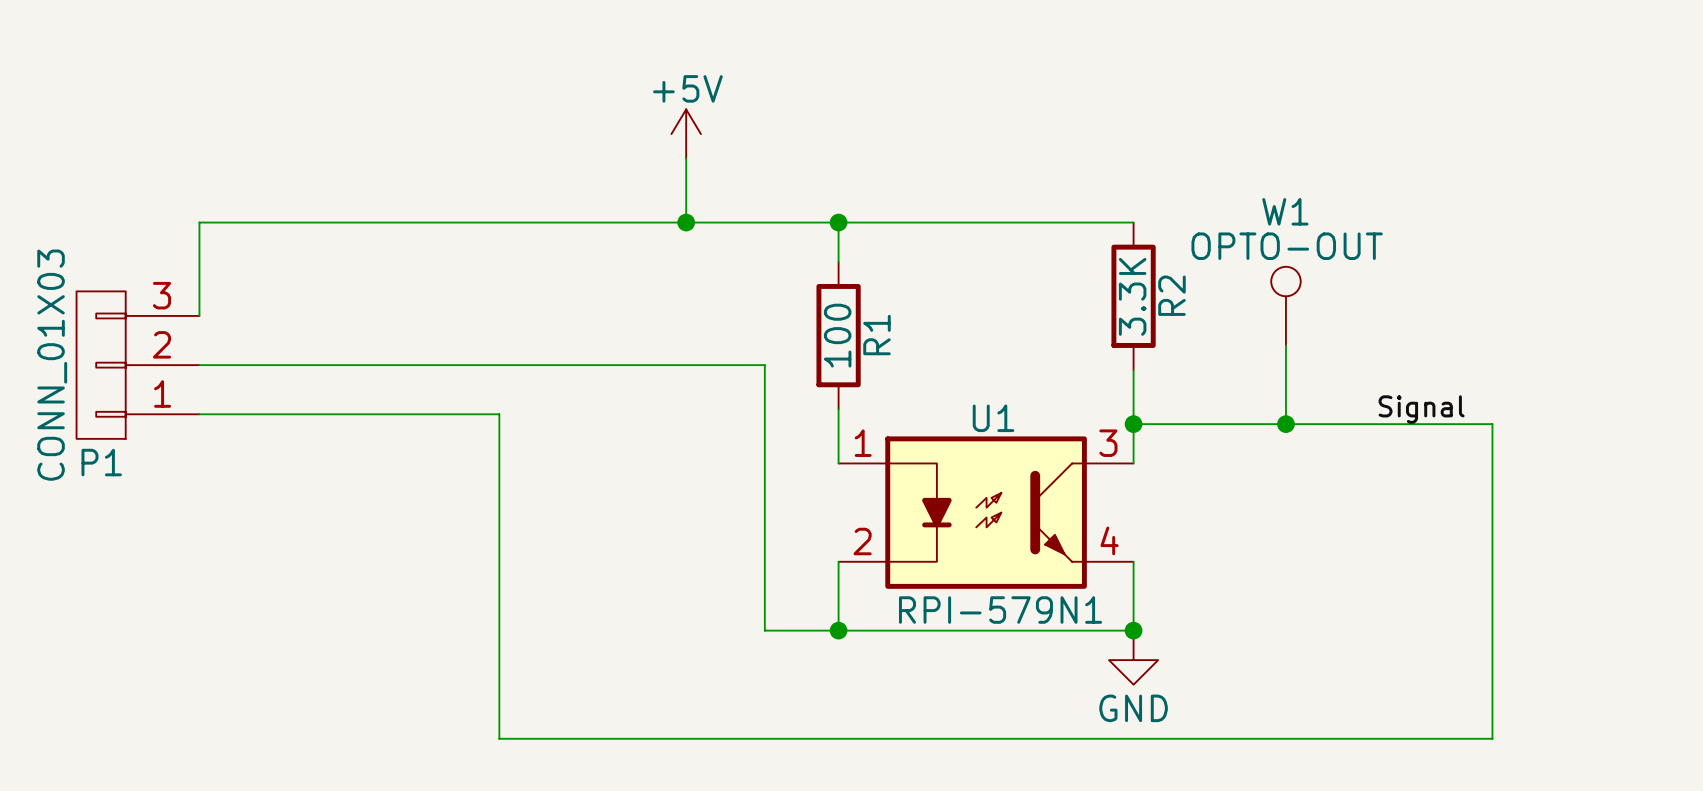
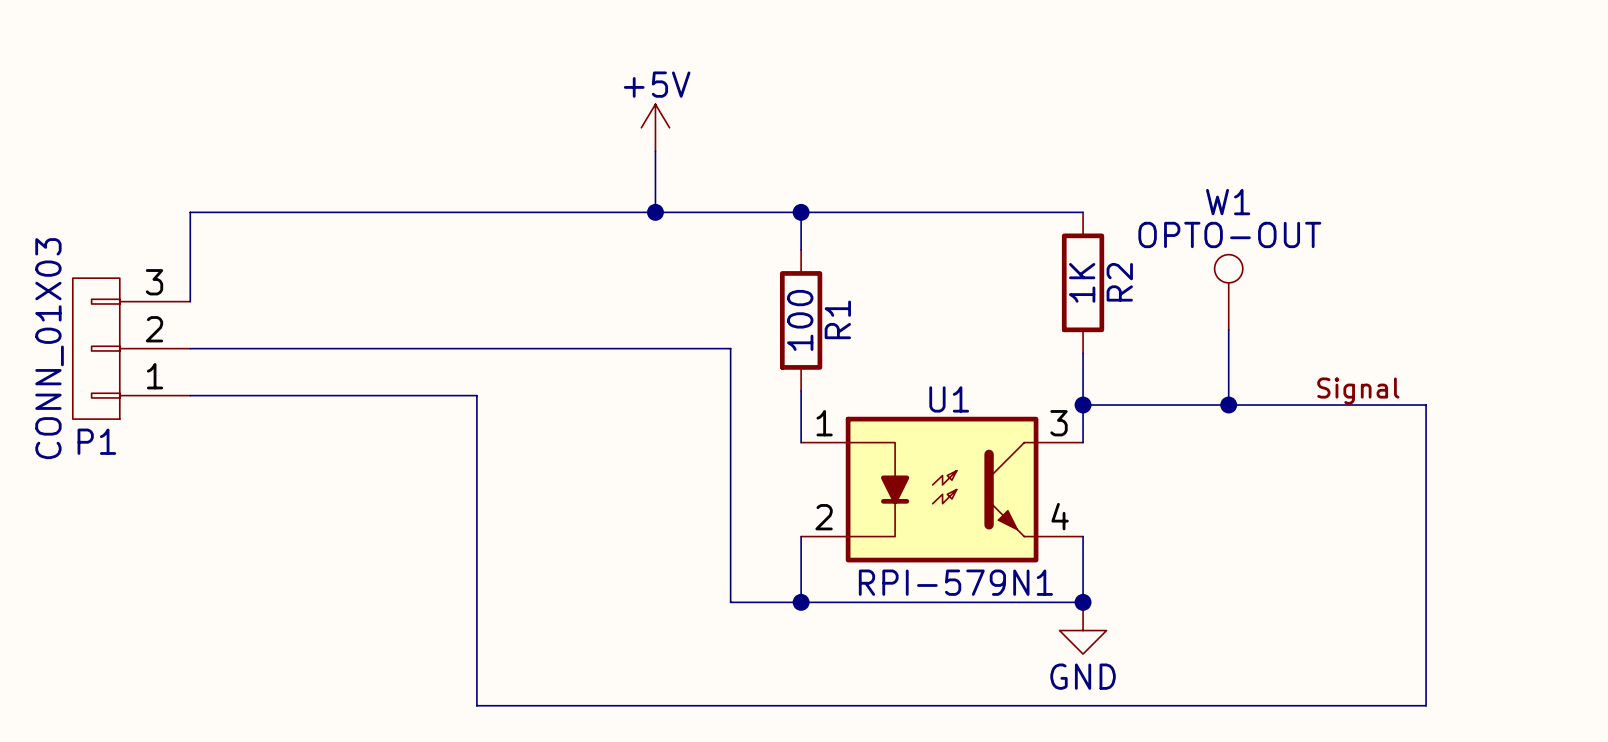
R2 value: 3.3K (1132, 296) -> 1K (1082, 282)

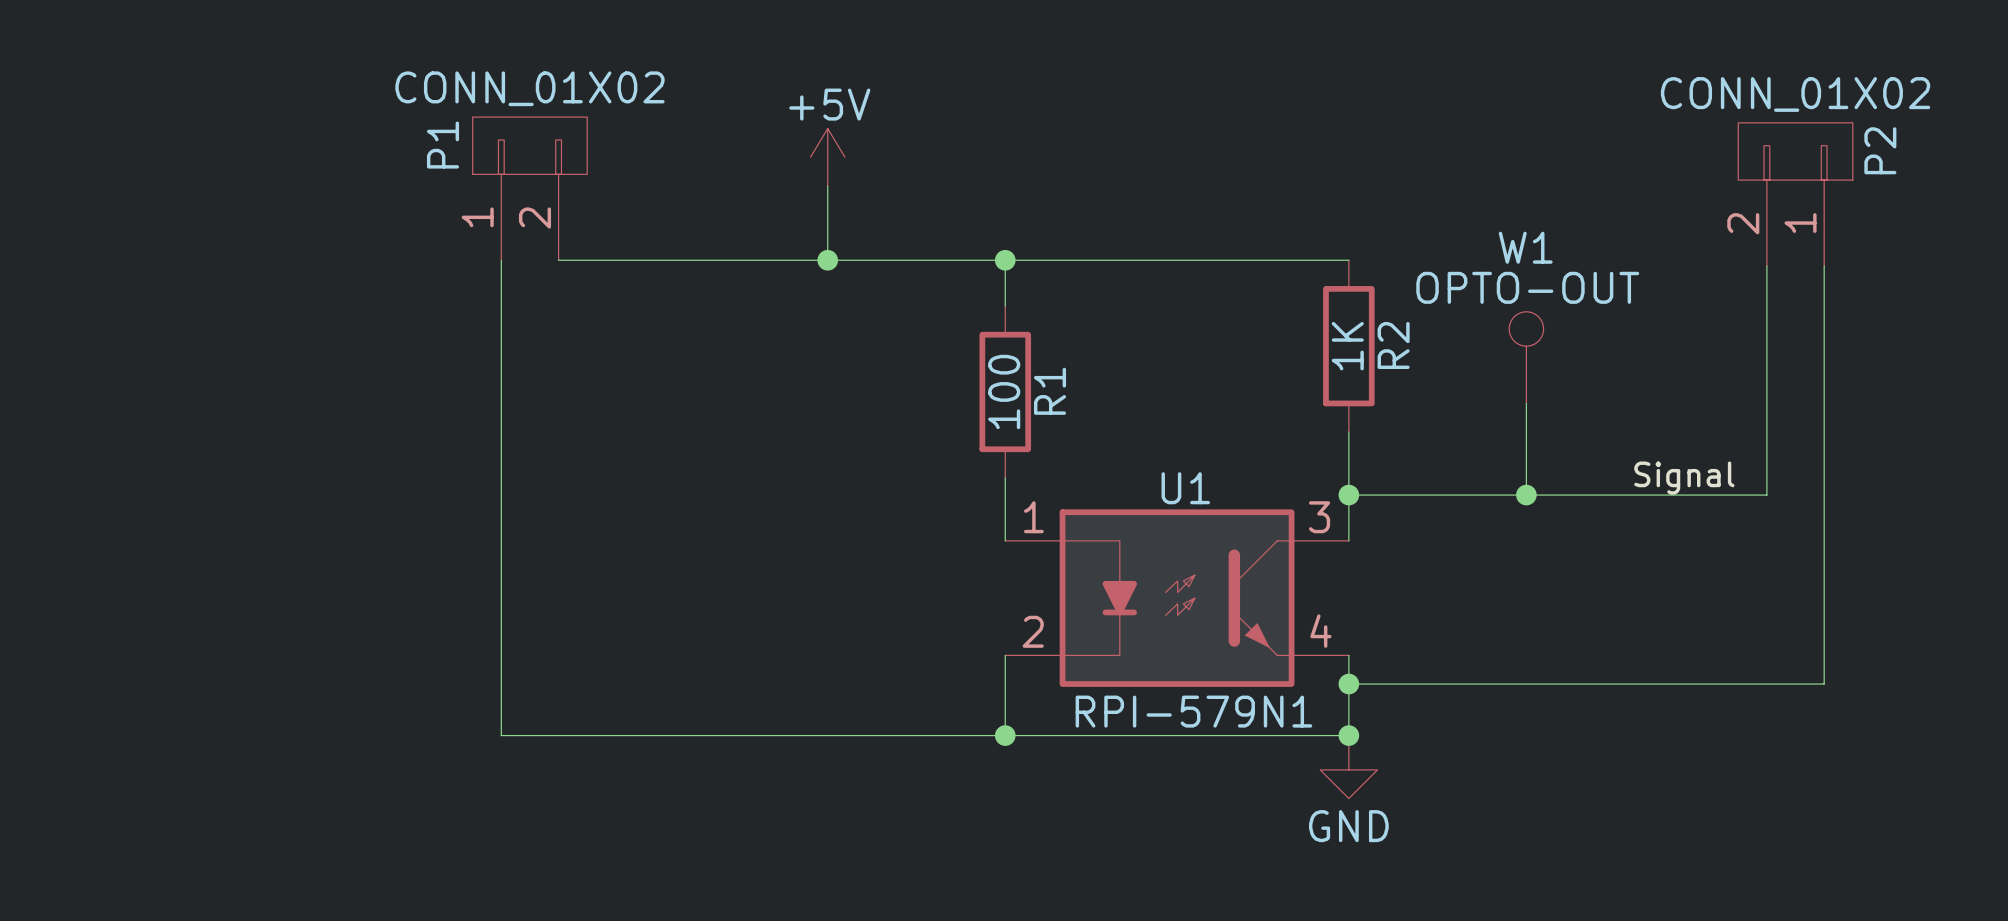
P2: none -> CONN_01X02 (1795, 194)
wire: (434, 212) (190, 212) (190, 301) -> none
wire: none -> (1824, 265) (1824, 684) (1348, 684)
P1 symbol: [72, 278, 191, 420] -> [472, 117, 588, 261]
P1 value: CONN_01X03 (49, 348) -> CONN_01X02 (529, 88)
wire: (190, 348) (730, 348) (730, 602) -> (501, 260) (501, 735) (919, 735)
wire: (190, 395) (476, 395) (476, 705) (1426, 705) (1426, 405) -> (1766, 265) (1766, 495)
P1 name position: P1 (96, 441) -> P1 (442, 145)
junction: none -> (1348, 684)

